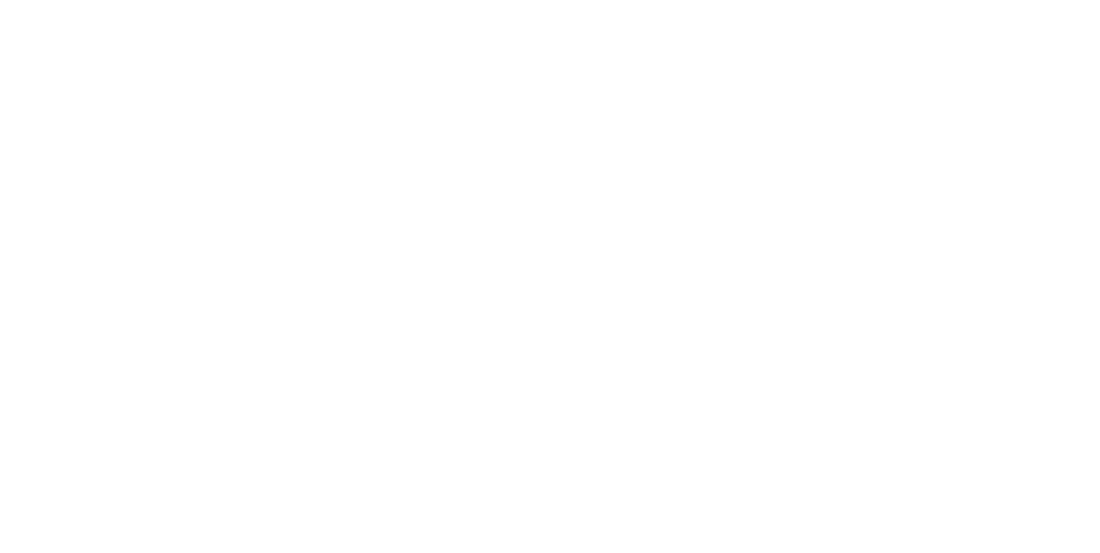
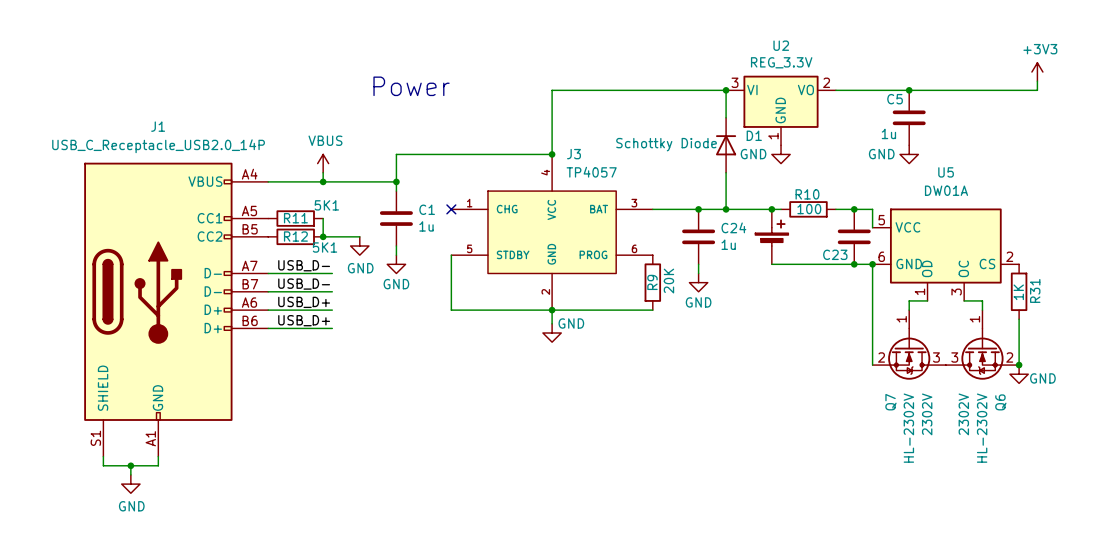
power symbol: none -> +3V3 (1037, 72)
wire: none -> (1037, 81) (1037, 90) (835, 90)
text: none -> Power (411, 86)
junction: none -> (726, 90)
junction: none -> (909, 90)
U2: none -> REG_3.3V (781, 110)
wire: none -> (726, 117) (726, 90) (552, 90) (552, 154) (396, 154) (396, 191)
C5: none -> 1u (909, 117)
D1: none -> Schottky Diode (726, 145)
junction: none -> (552, 154)
power symbol: none -> GND (781, 154)
power symbol: none -> GND (909, 154)
power symbol: none -> VBUS (323, 163)
wire: none -> (323, 172) (323, 181)
wire: none -> (726, 172) (726, 209)
wire: none -> (268, 181) (396, 181)
junction: none -> (323, 181)
junction: none -> (396, 181)
no-connect mark: none -> (451, 209)
wire: none -> (652, 209) (781, 209)
junction: none -> (698, 209)
junction: none -> (726, 209)
junction: none -> (771, 209)
R10: none -> 100 (808, 209)
wire: none -> (835, 209) (872, 209) (872, 227)
junction: none -> (854, 209)
R11: none -> 5K1 (295, 218)
wire: none -> (323, 218) (323, 236) (359, 236)
C1: none -> 1u (396, 218)
J3: none -> TP4057 (552, 232)
R12: none -> 5K1 (295, 236)
junction: none -> (323, 236)
C24: none -> 1u (698, 236)
part: none -> (771, 236)
C23: none -> (854, 236)
power symbol: none -> GND (359, 246)
wire: none -> (396, 246) (396, 255)
U5: none -> DW01A (945, 254)
wire: none -> (451, 255) (451, 310) (652, 310)
power symbol: none -> GND (396, 264)
wire: none -> (698, 264) (698, 273)
wire: none -> (771, 264) (872, 264) (872, 365)
junction: none -> (854, 264)
junction: none -> (872, 264)
label: none -> USB_D- (304, 265)
wire: none -> (268, 273) (332, 273)
R9: none -> 20K (652, 282)
power symbol: none -> GND (698, 282)
label: none -> USB_D- (304, 284)
wire: none -> (268, 291) (332, 291)
R31: none -> 1K (1019, 291)
wire: none -> (927, 300) (909, 300) (909, 310)
wire: none -> (964, 300) (982, 300) (982, 310)
label: none -> USB_D+ (304, 302)
J1: none -> USB_C_Receptacle_USB2.0_14P (176, 309)
wire: none -> (268, 310) (332, 310)
wire: none -> (552, 310) (552, 323)
junction: none -> (552, 310)
wire: none -> (1019, 319) (1019, 365)
label: none -> USB_D+ (304, 320)
wire: none -> (268, 328) (332, 328)
power symbol: none -> GND (552, 333)
Q7: none -> HL-2302V (909, 344)
Q6: none -> HL-2302V (982, 344)
junction: none -> (1019, 365)
power symbol: none -> GND (1019, 374)
wire: none -> (103, 456) (103, 465) (158, 465) (158, 456)
wire: none -> (130, 465) (130, 474)
junction: none -> (130, 465)
power symbol: none -> GND (130, 484)

